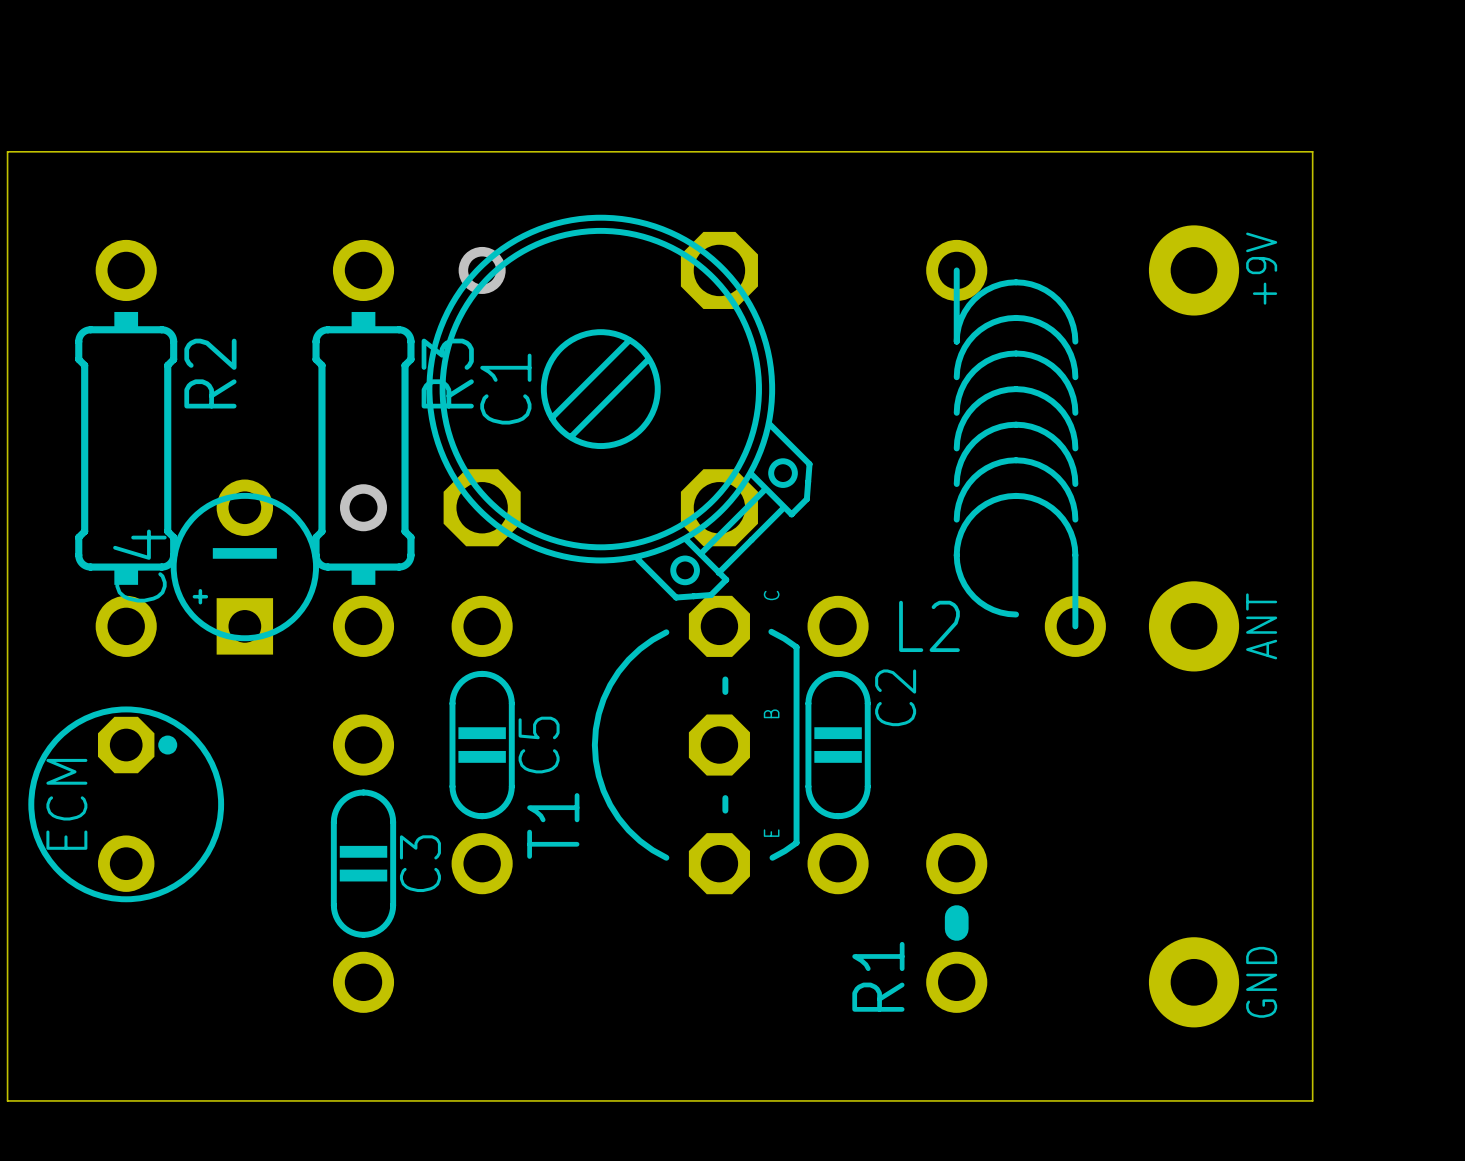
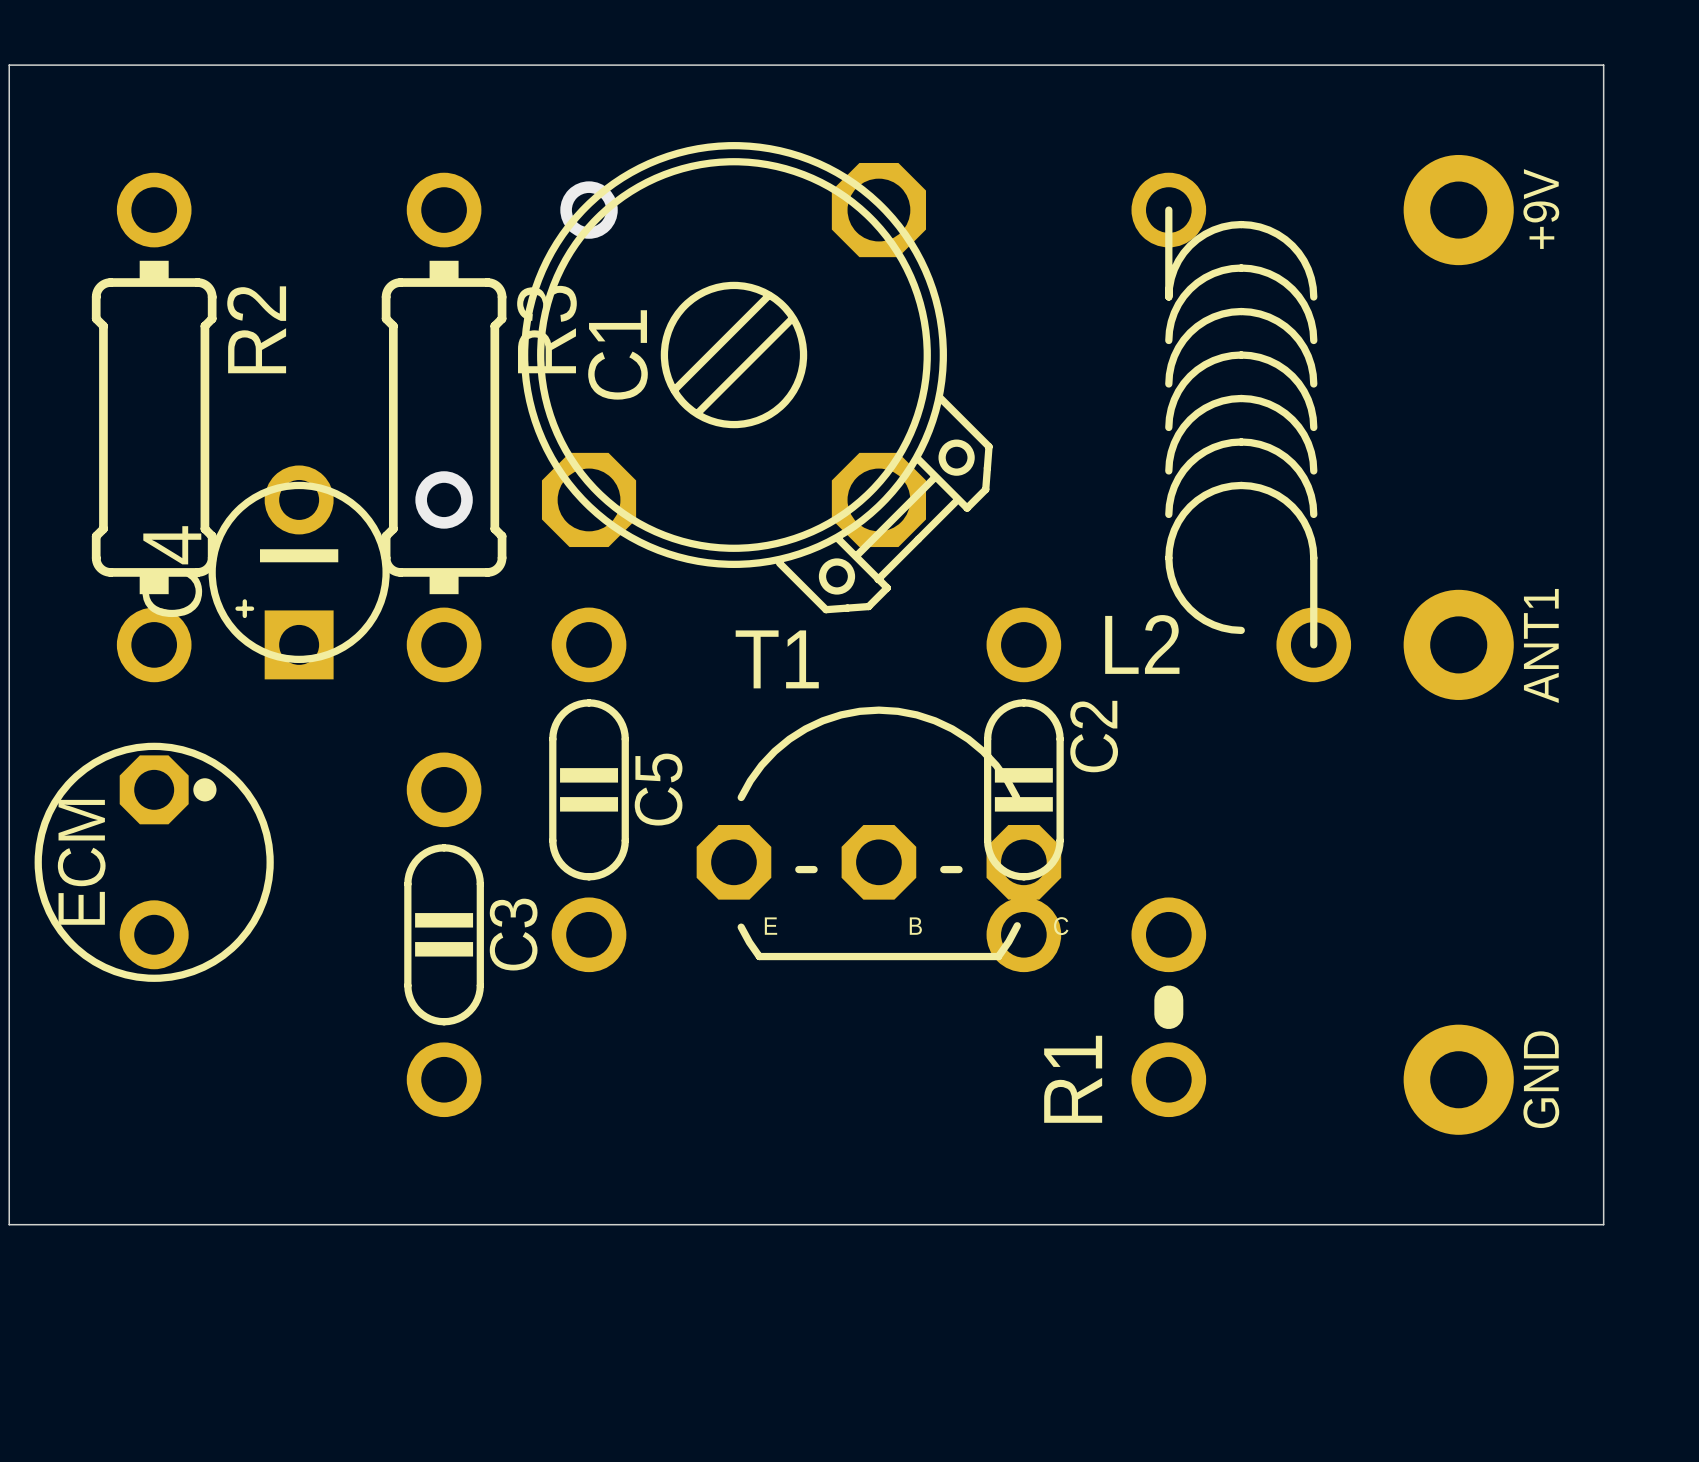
ANT name: ANT (1261, 626) -> ANT1 (1541, 645)
T1 rotation: 0° (695, 745) -> 90° clockwise (878, 833)

